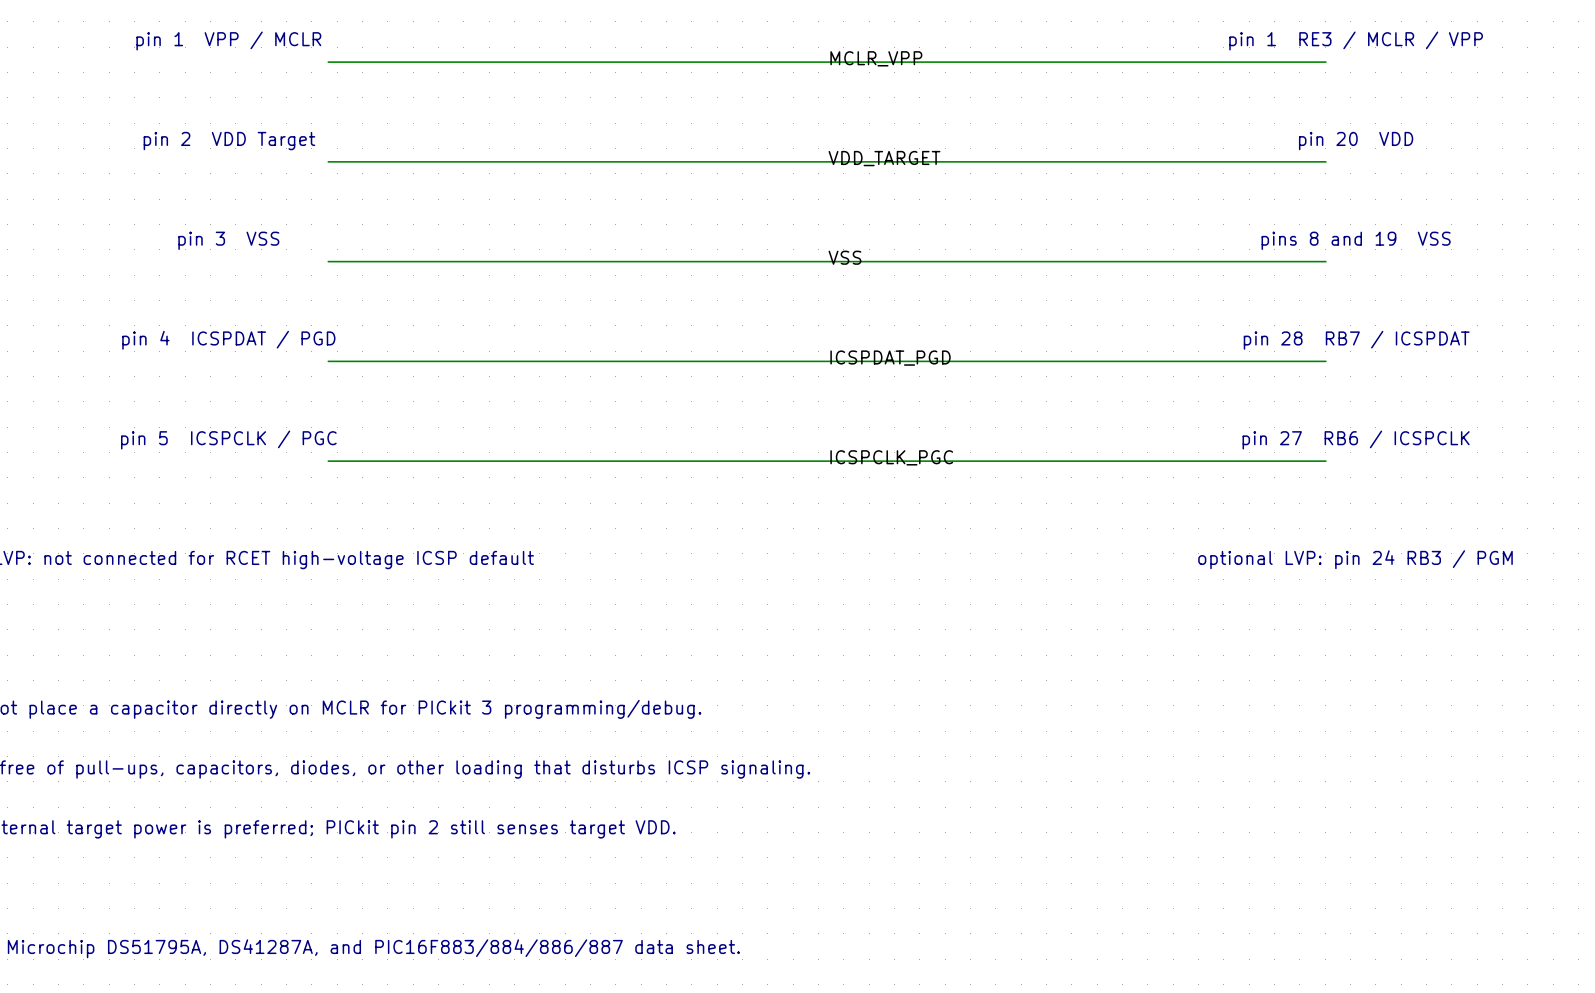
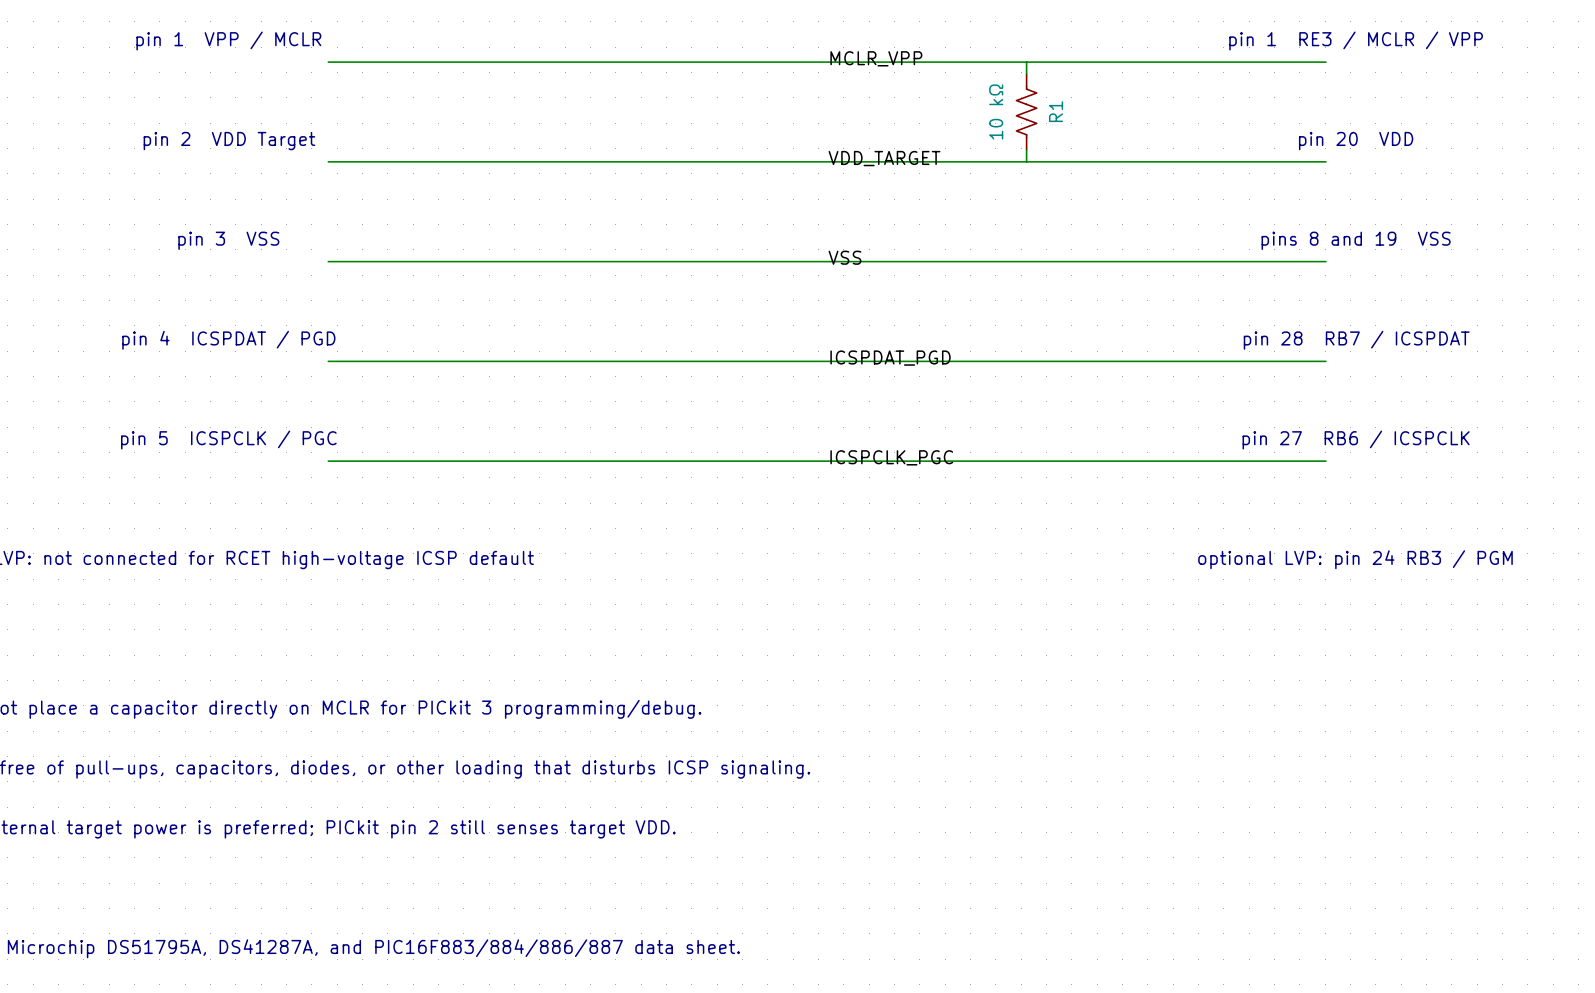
wire: none -> (1026, 62) (1026, 73)
R1: none -> 10 kΩ (1026, 111)
wire: none -> (1026, 149) (1026, 161)

